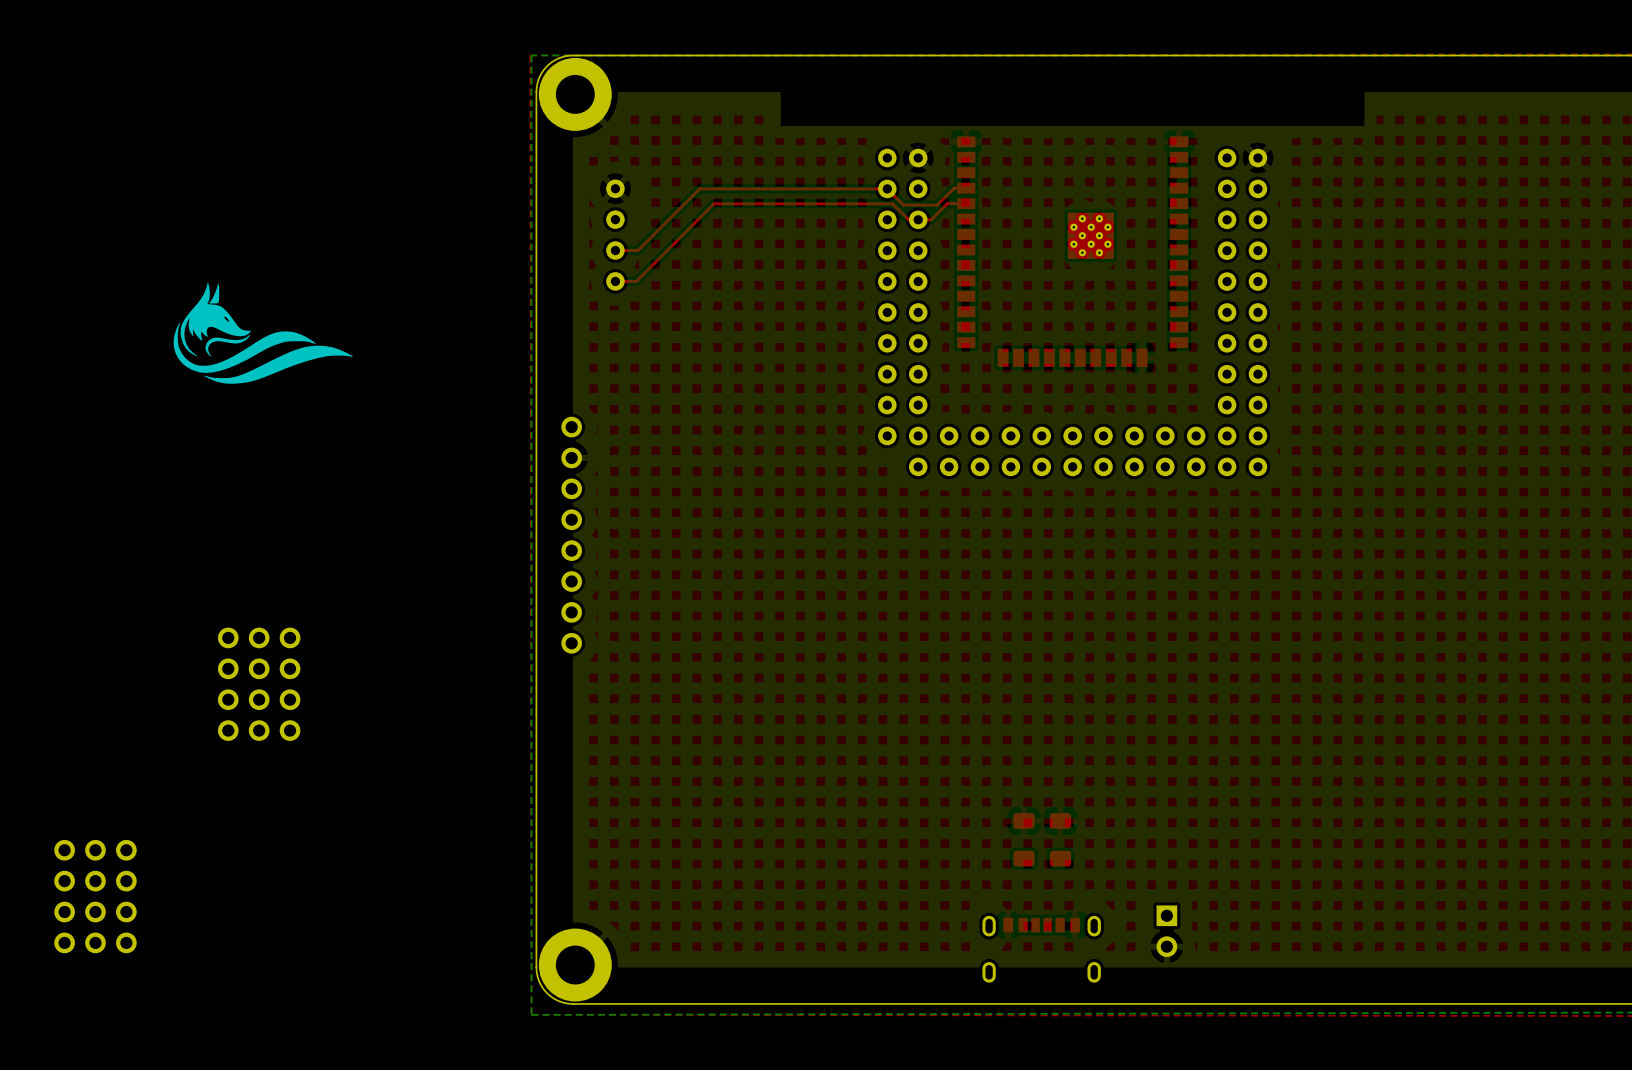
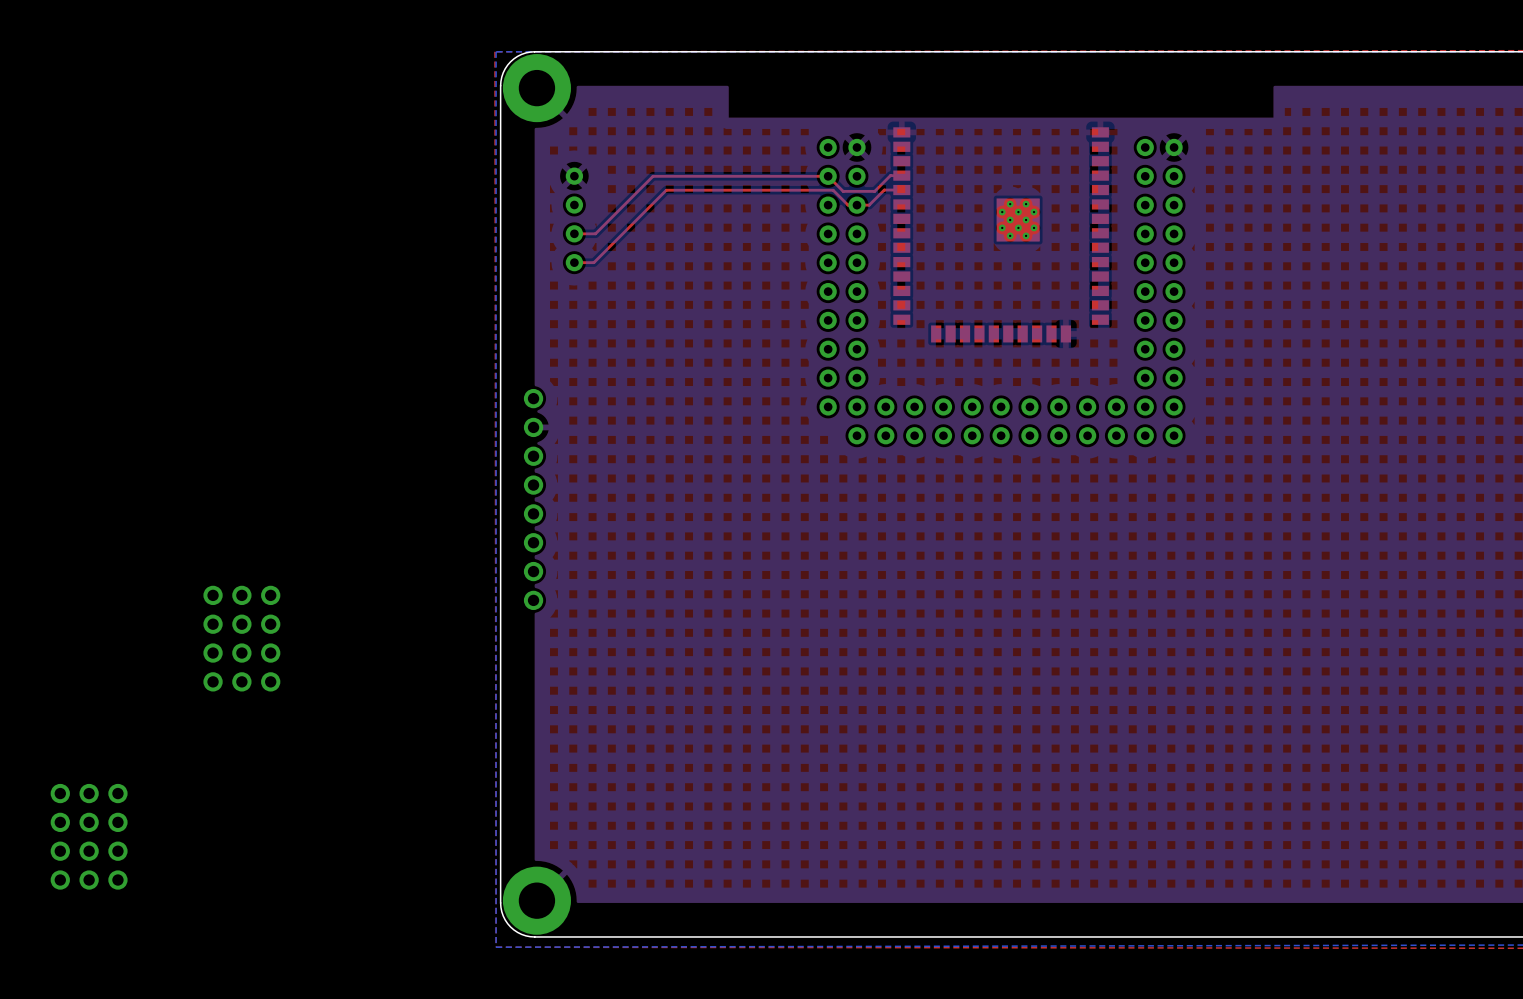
drawing: [173, 282, 353, 384] -> none
part: (1024, 839) -> none
part: (1060, 839) -> none
part: (1166, 931) -> none
part: (1041, 949) -> none

